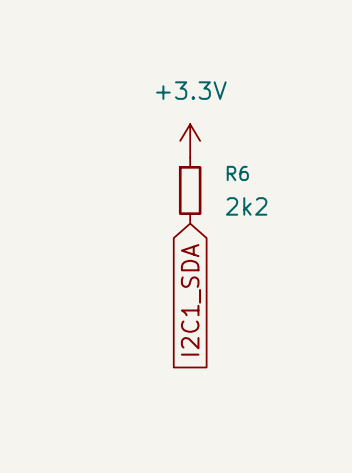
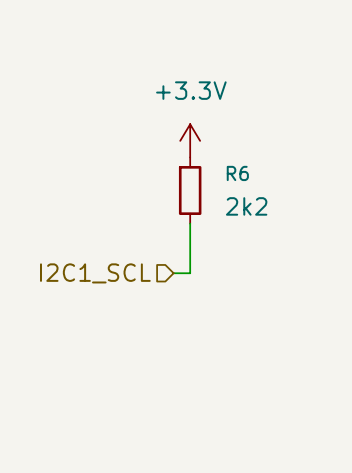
wire: none -> (190, 223) (190, 273) (173, 273)
hierarchical label: none -> I2C1_SCL (95, 273)
global label: I2C1_SDA (190, 299) -> none

